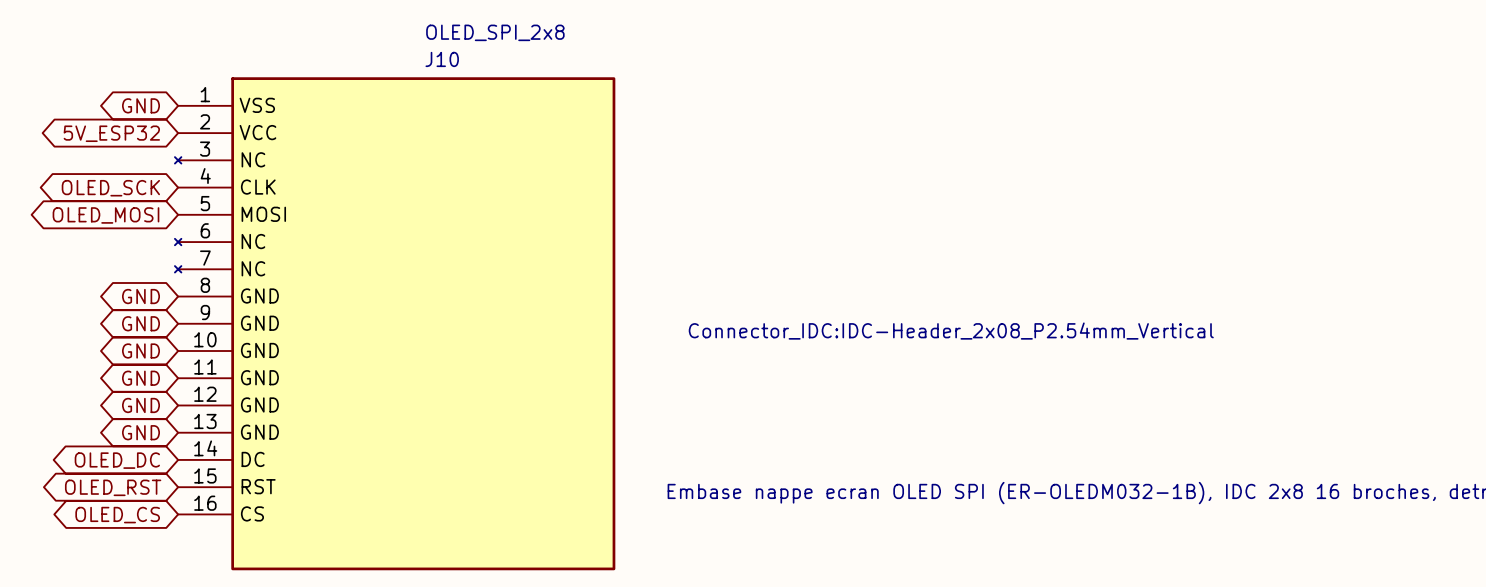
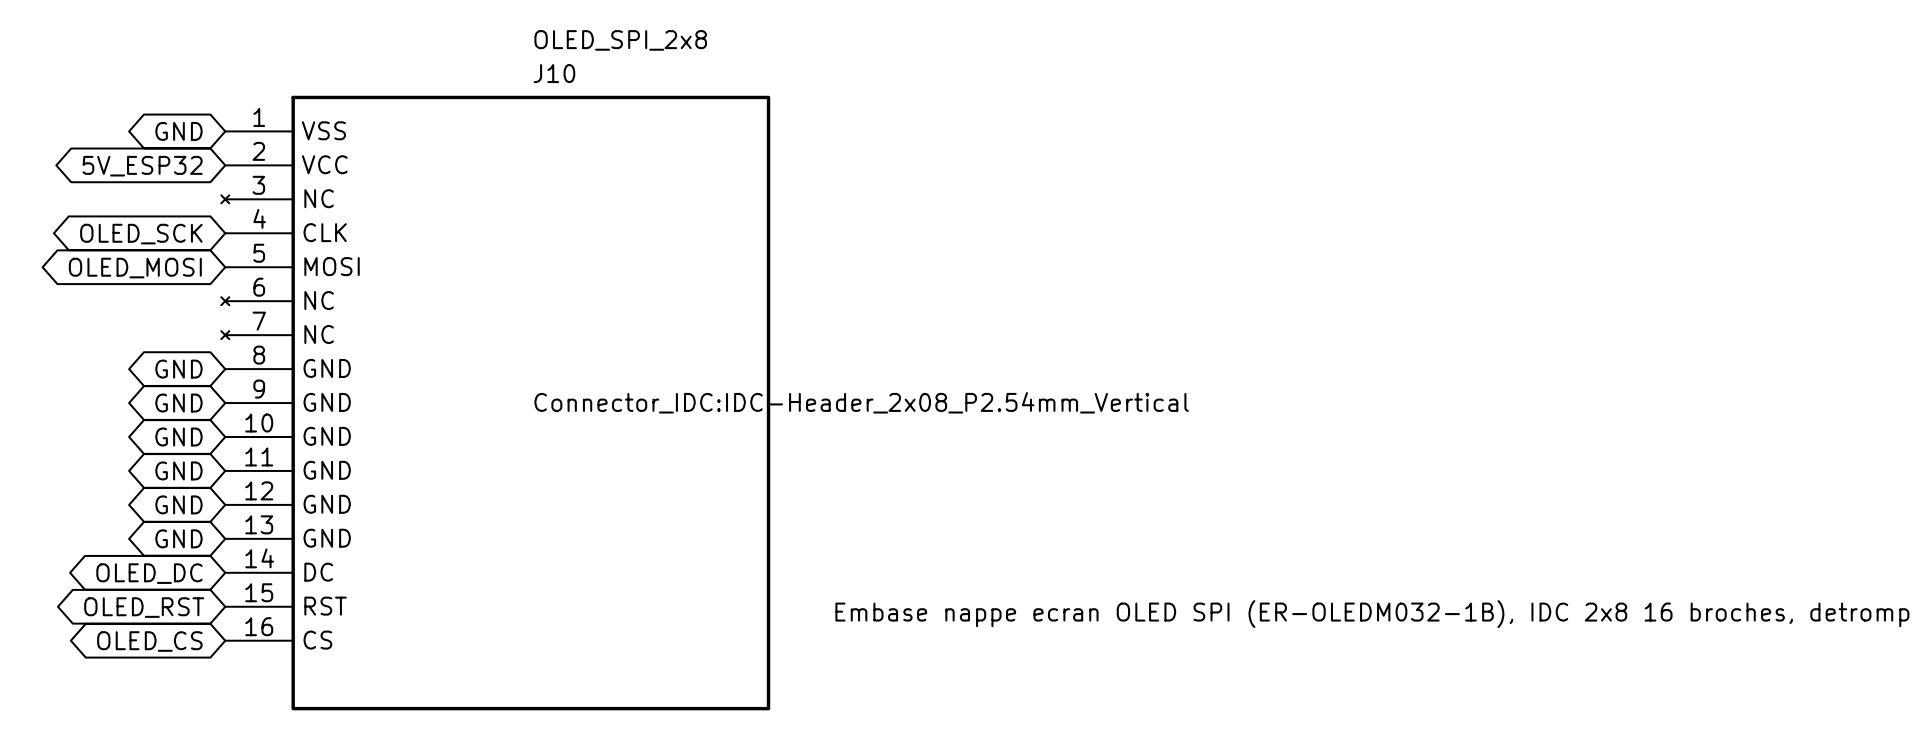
J10 text position: Connector_IDC:IDC-Header_2x08_P2.54mm_Vertical (951, 331) -> Connector_IDC:IDC-Header_2x08_P2.54mm_Vertical (861, 402)

